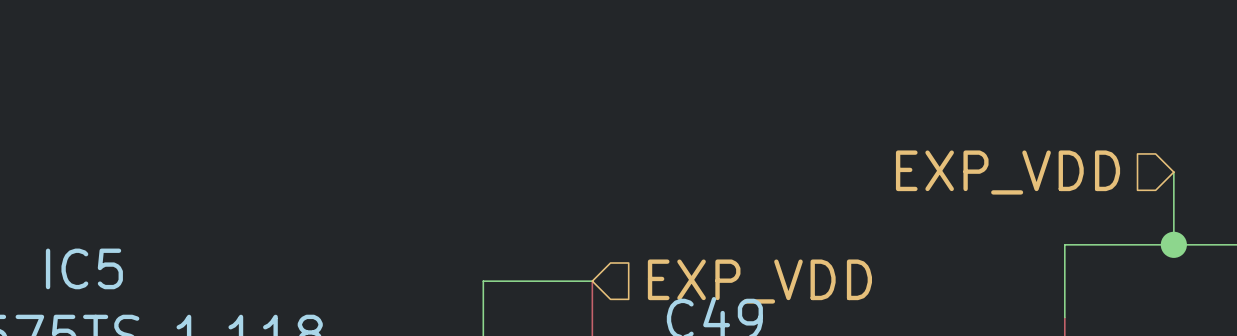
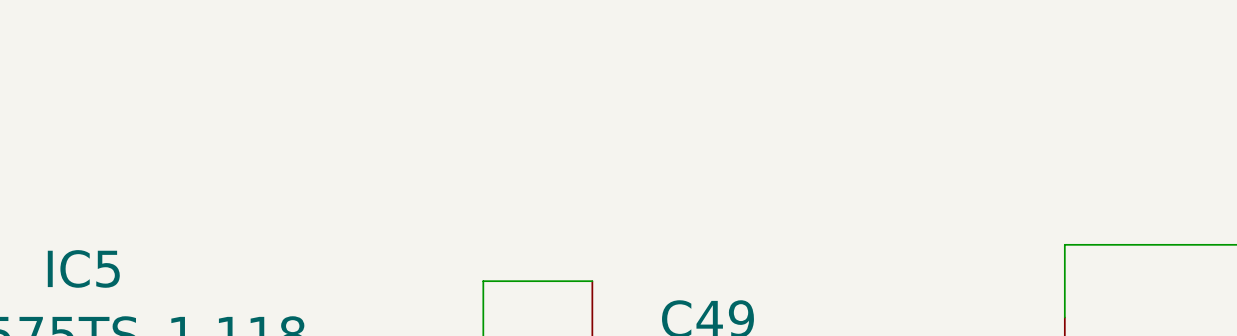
hierarchical label: EXP_VDD (1008, 172) -> none
wire: (1173, 172) (1173, 244) -> none
junction: (1173, 244) -> none
hierarchical label: EXP_VDD (759, 281) -> none

